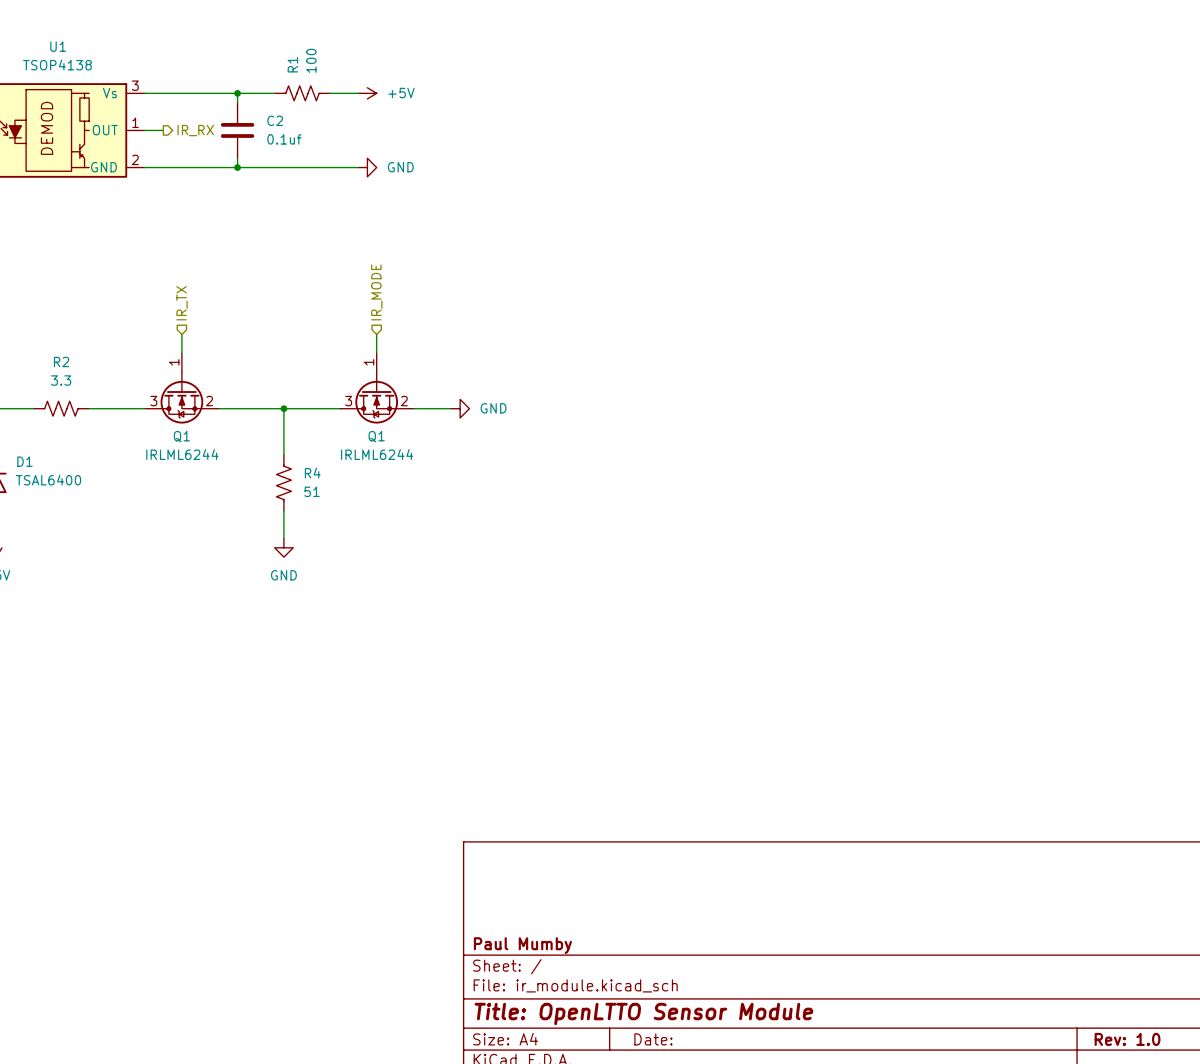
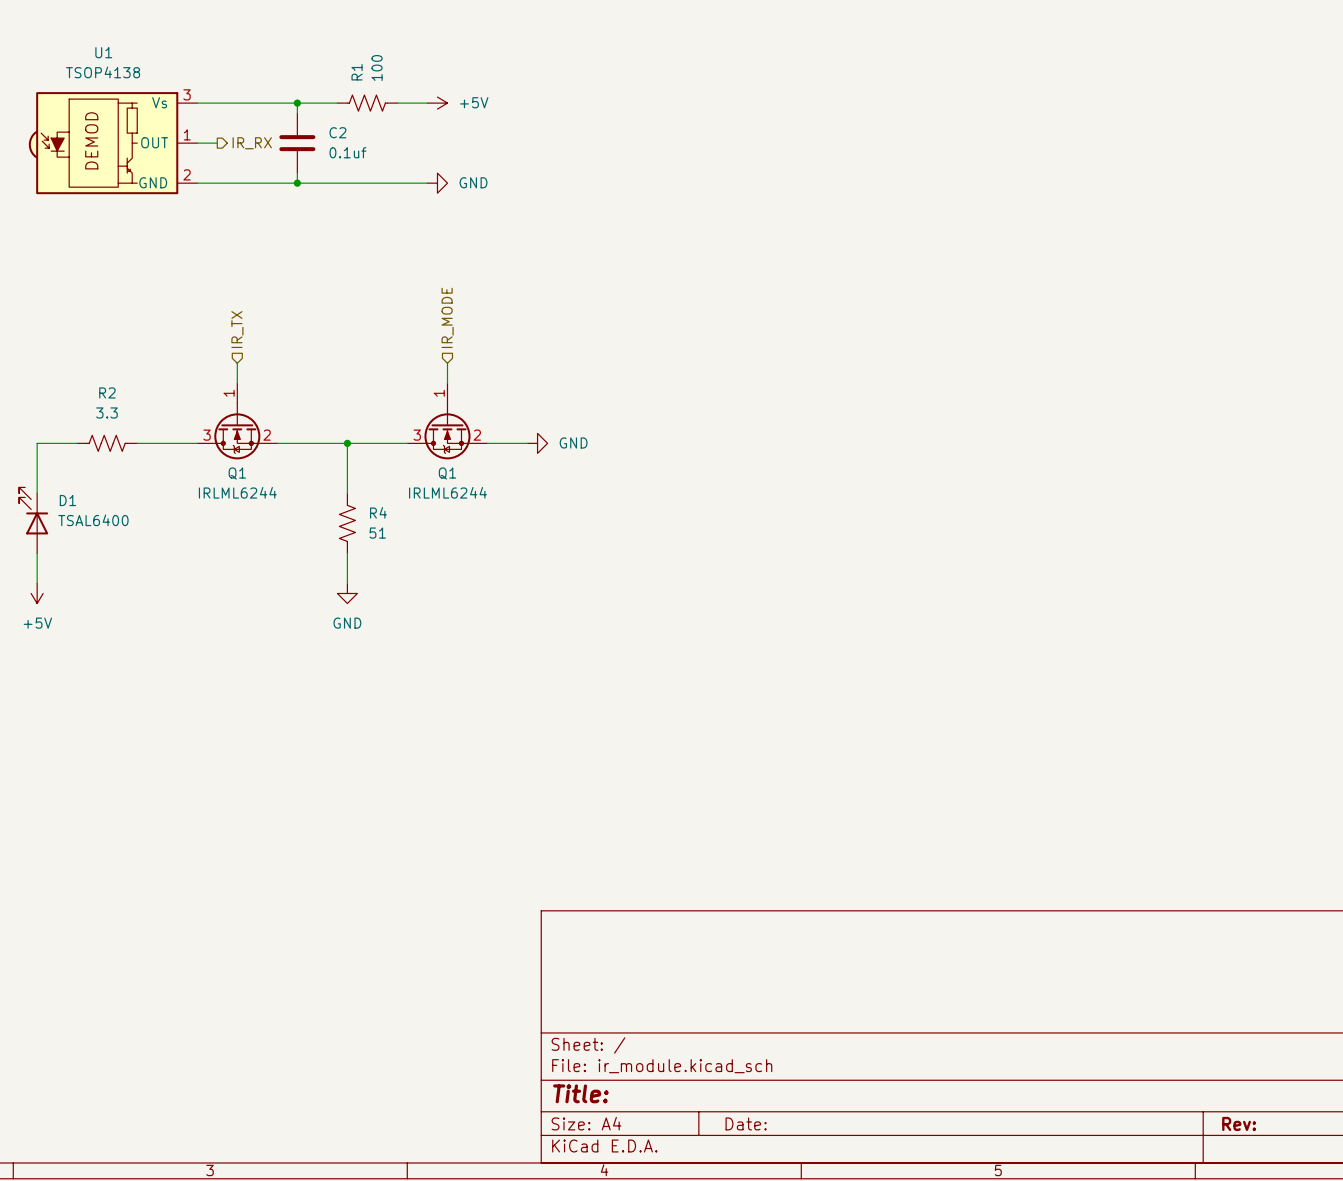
title block: Paul Mumby (522, 945) -> none
title block: Title: OpenLTTO Sensor Module (643, 1013) -> Title: (580, 1093)
title block: Rev: 1.0 (1127, 1039) -> Rev: (1239, 1123)

